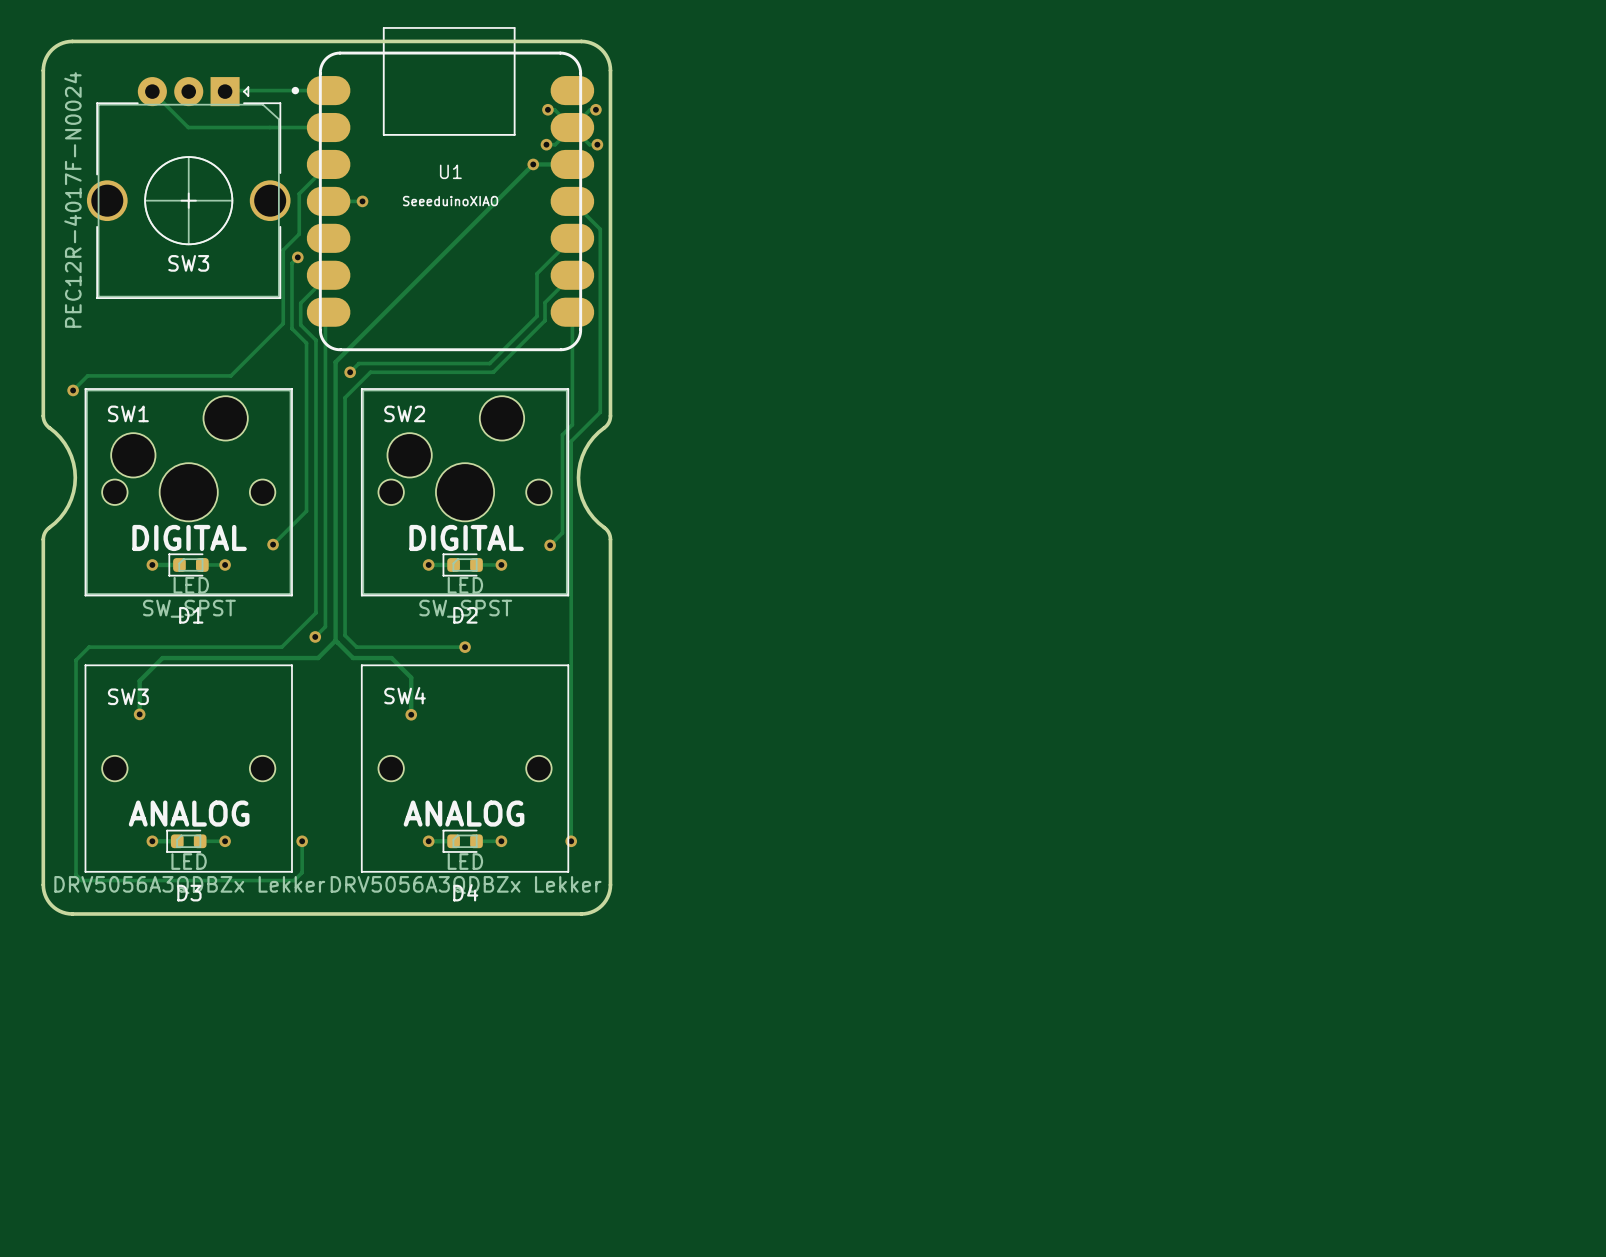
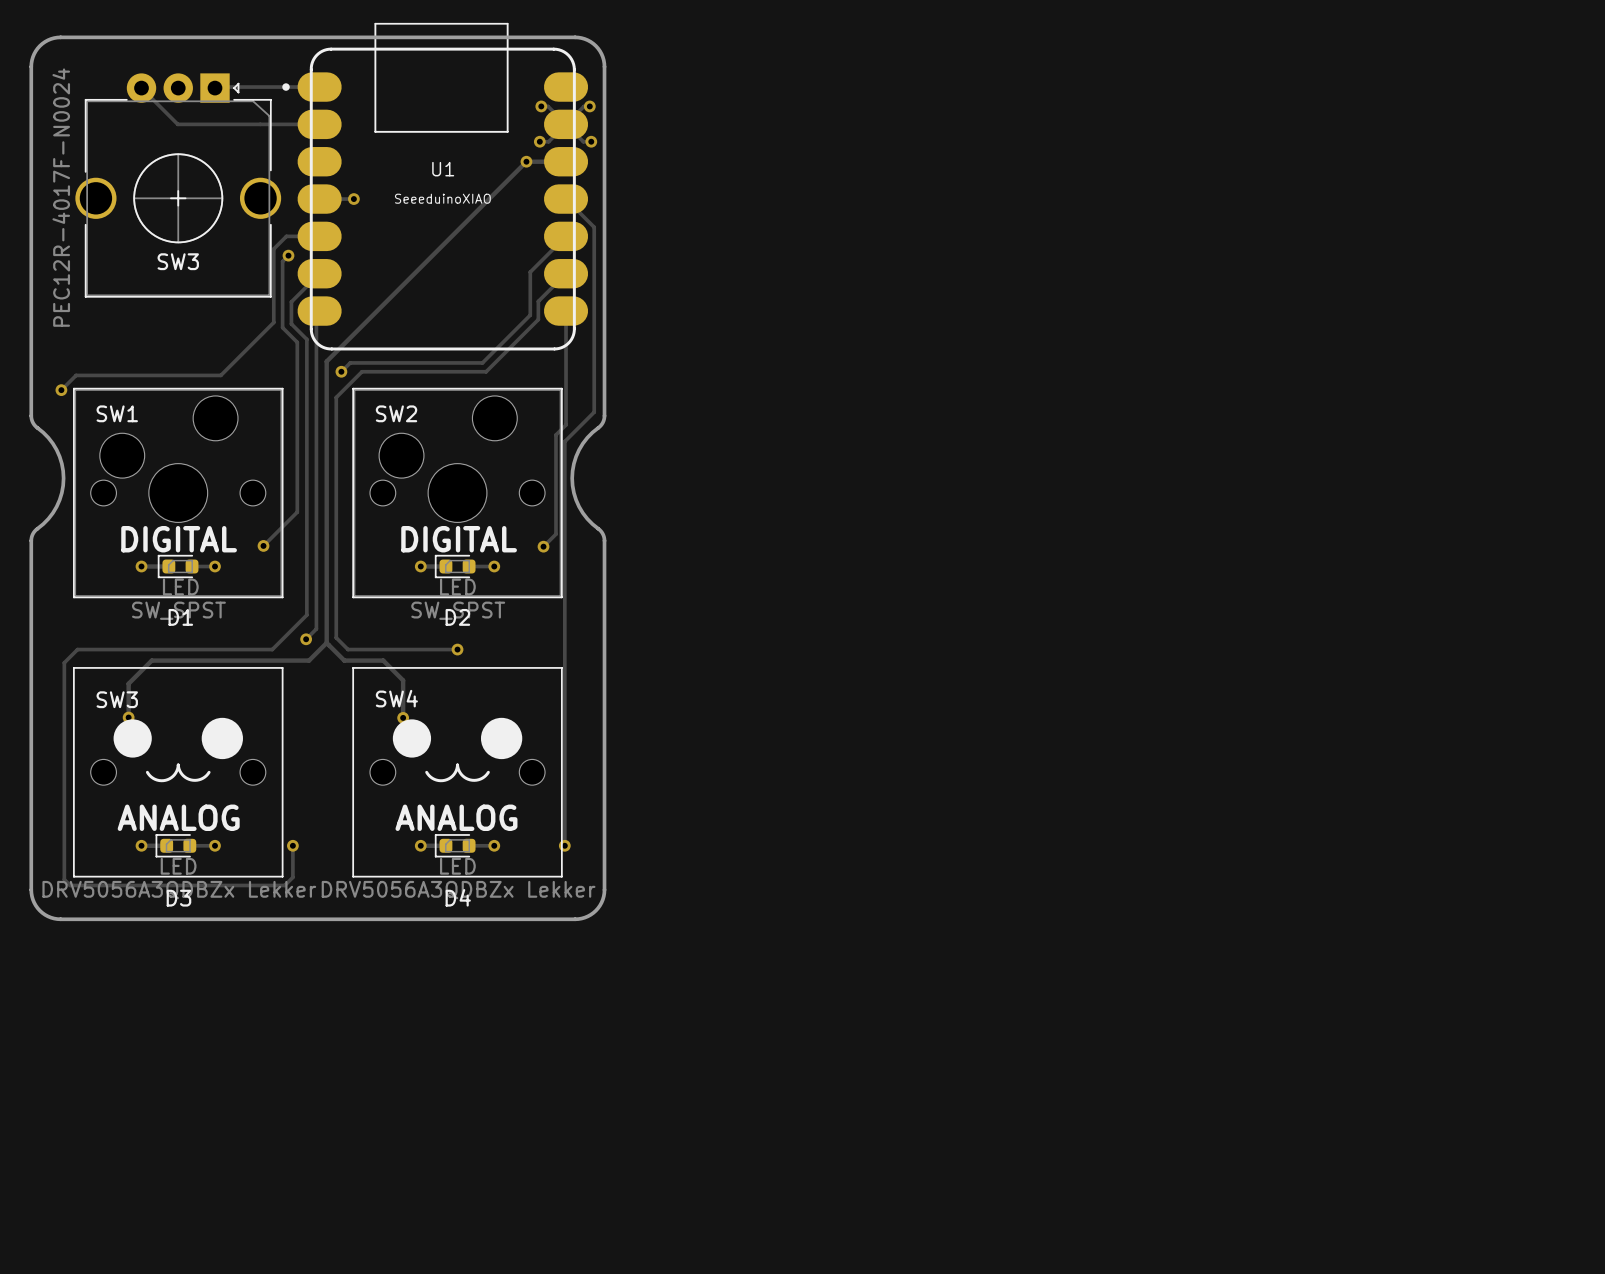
track: (328, 164) (299, 193) (299, 234) (283, 250) -> (319, 236) (286, 236) (273, 249)
drawing: none -> [201, 717, 243, 760]
drawing: none -> [480, 717, 523, 760]
drawing: none -> [113, 719, 152, 758]
drawing: none -> [392, 719, 432, 758]
line: none -> (147, 772) (153, 778) (161, 780) (173, 776) (178, 764) (182, 774) (190, 779) (201, 779) (209, 772)
line: none -> (426, 772) (432, 778) (440, 780) (452, 776) (457, 764) (461, 774) (470, 779) (480, 779) (488, 772)

